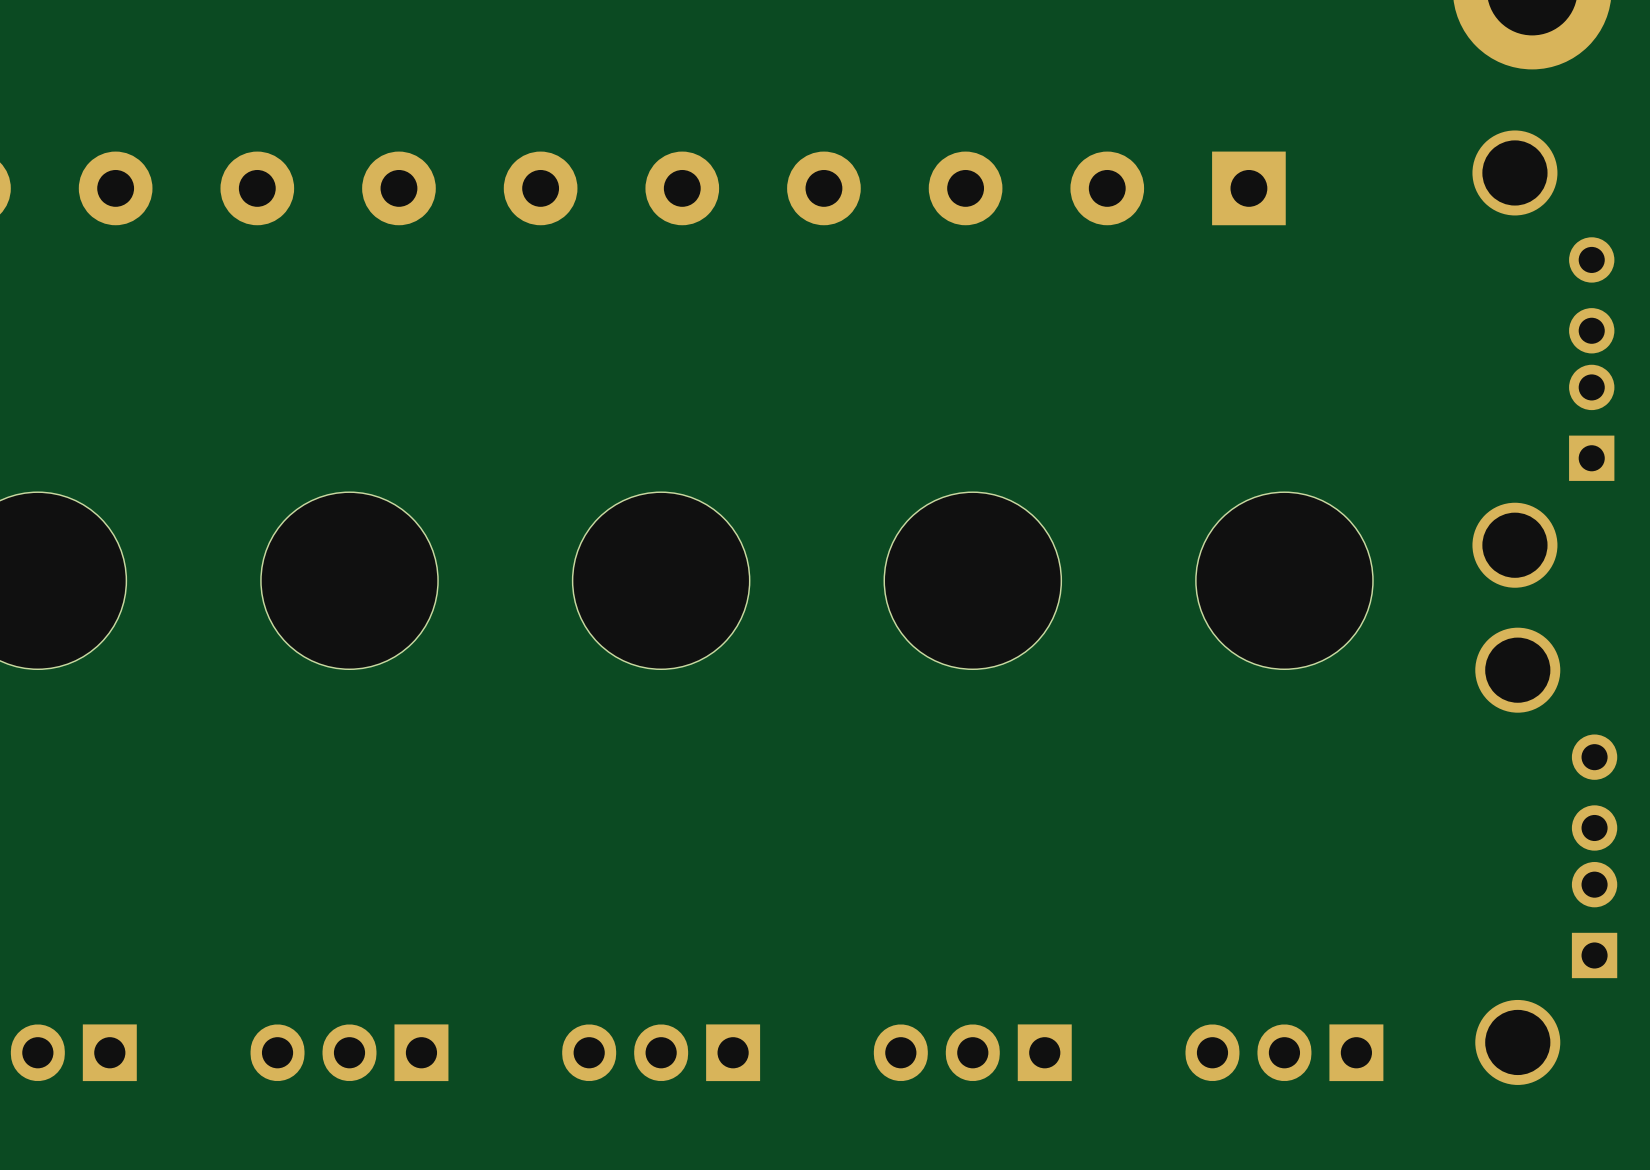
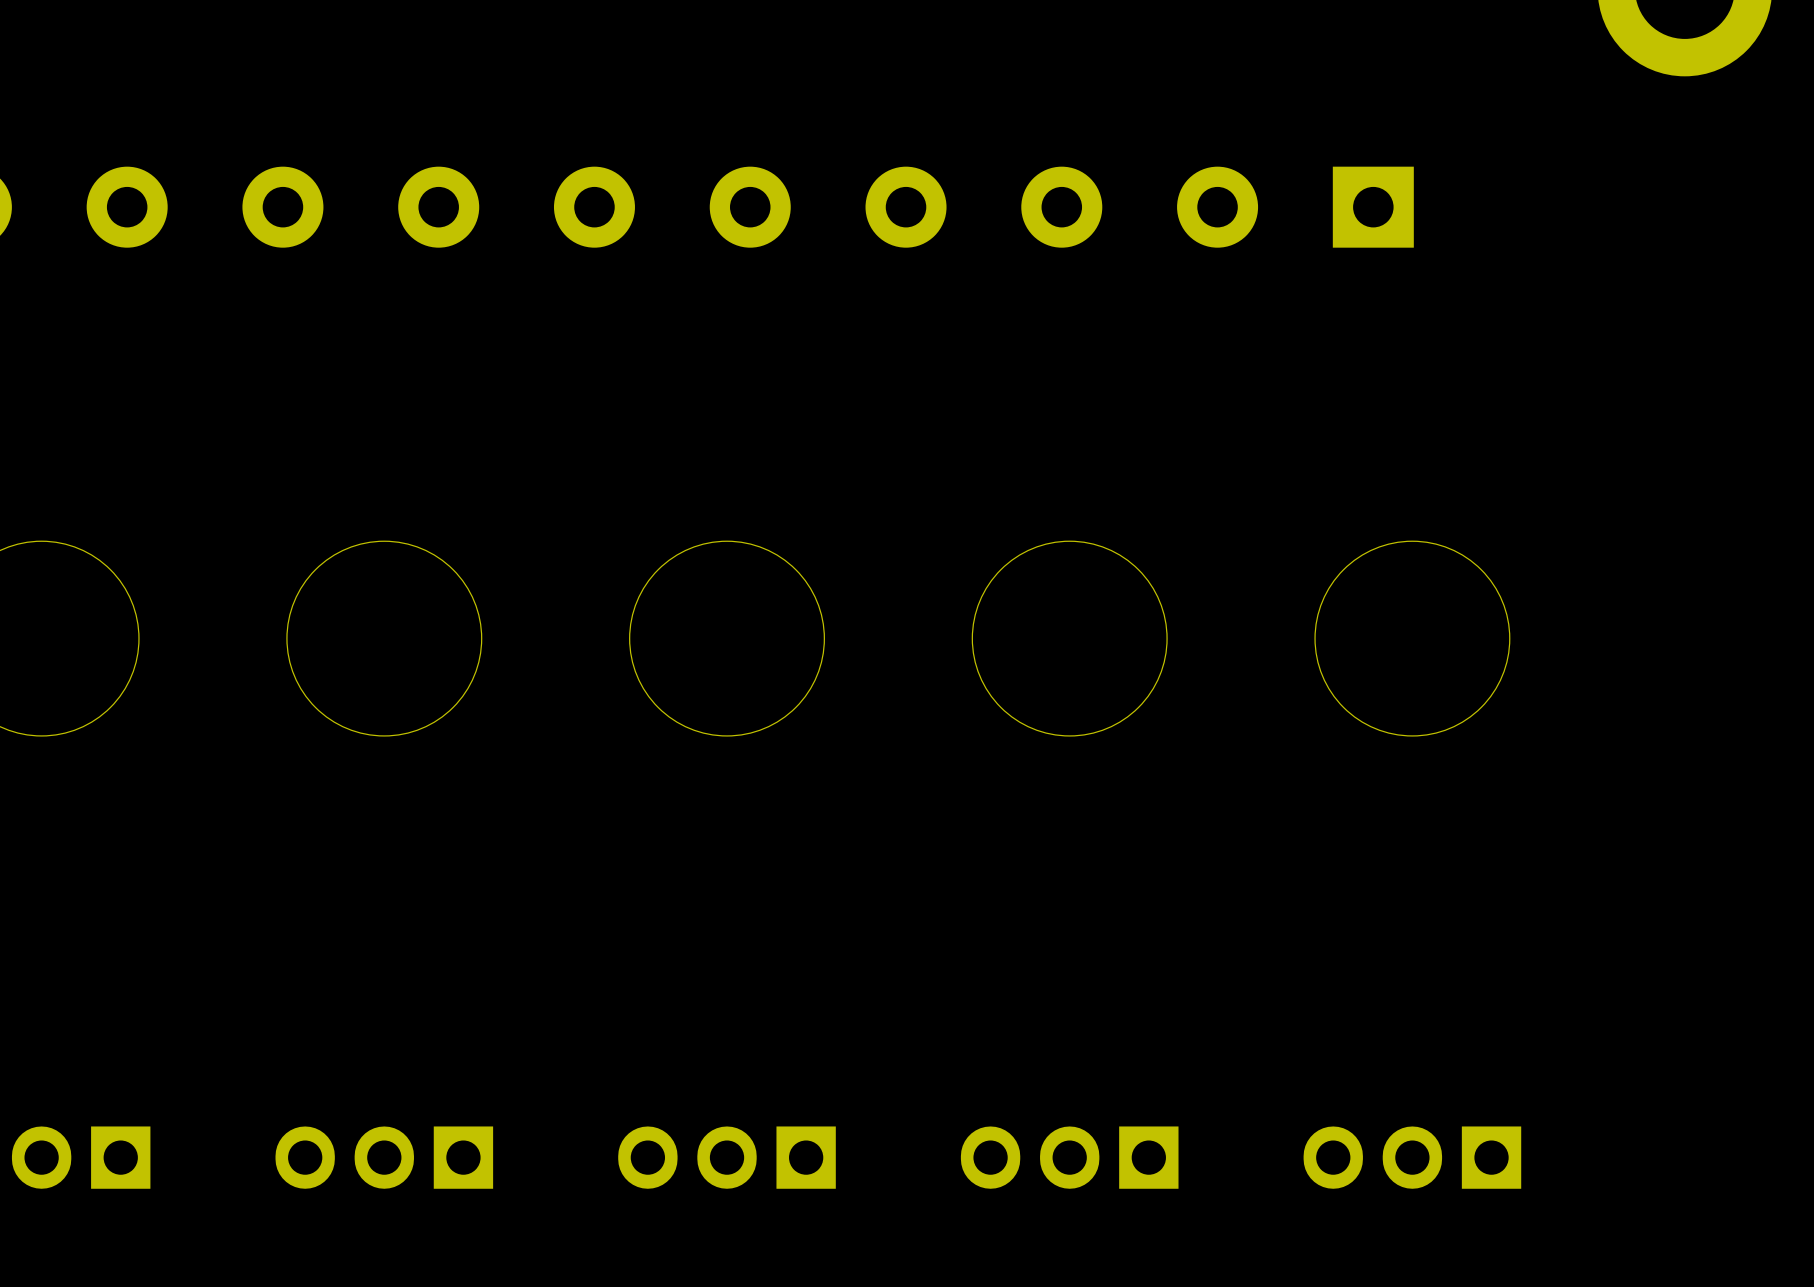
part: (1543, 359) -> none
part: (1546, 856) -> none

